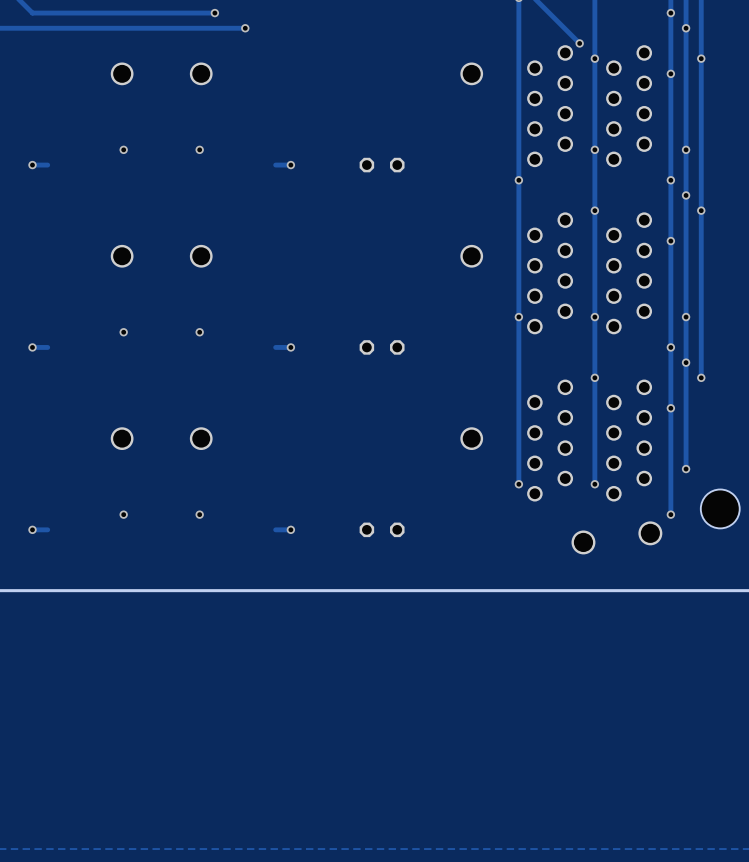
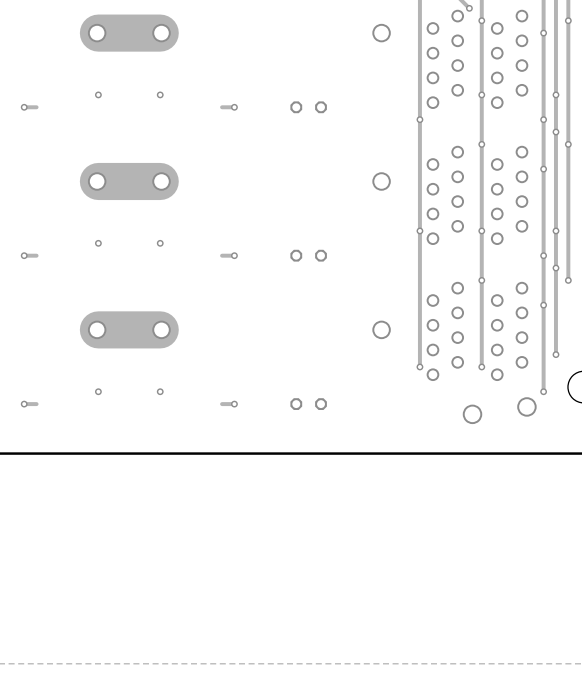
track: none -> (160, 33) (98, 33)
track: none -> (160, 181) (98, 181)
track: none -> (160, 329) (98, 329)

